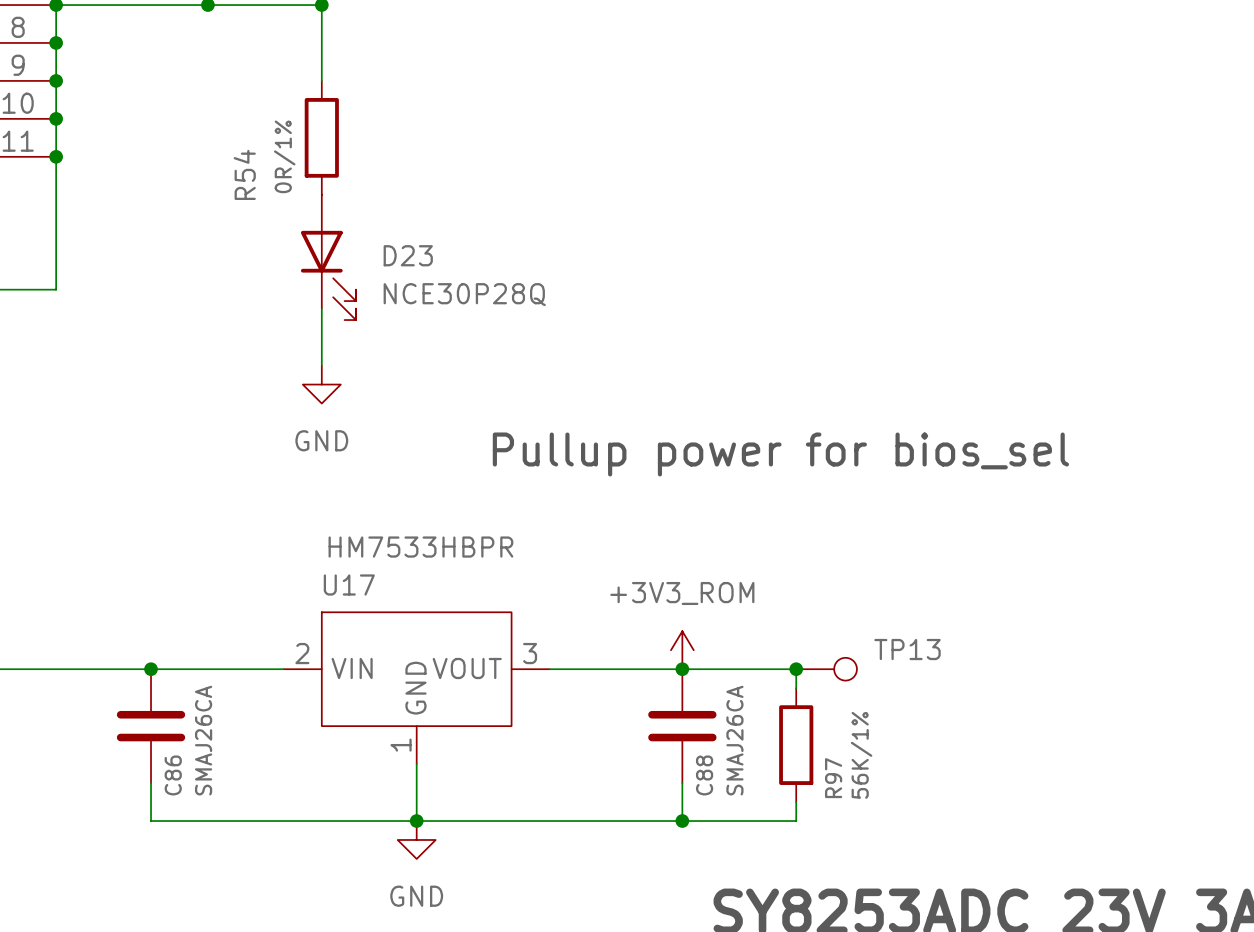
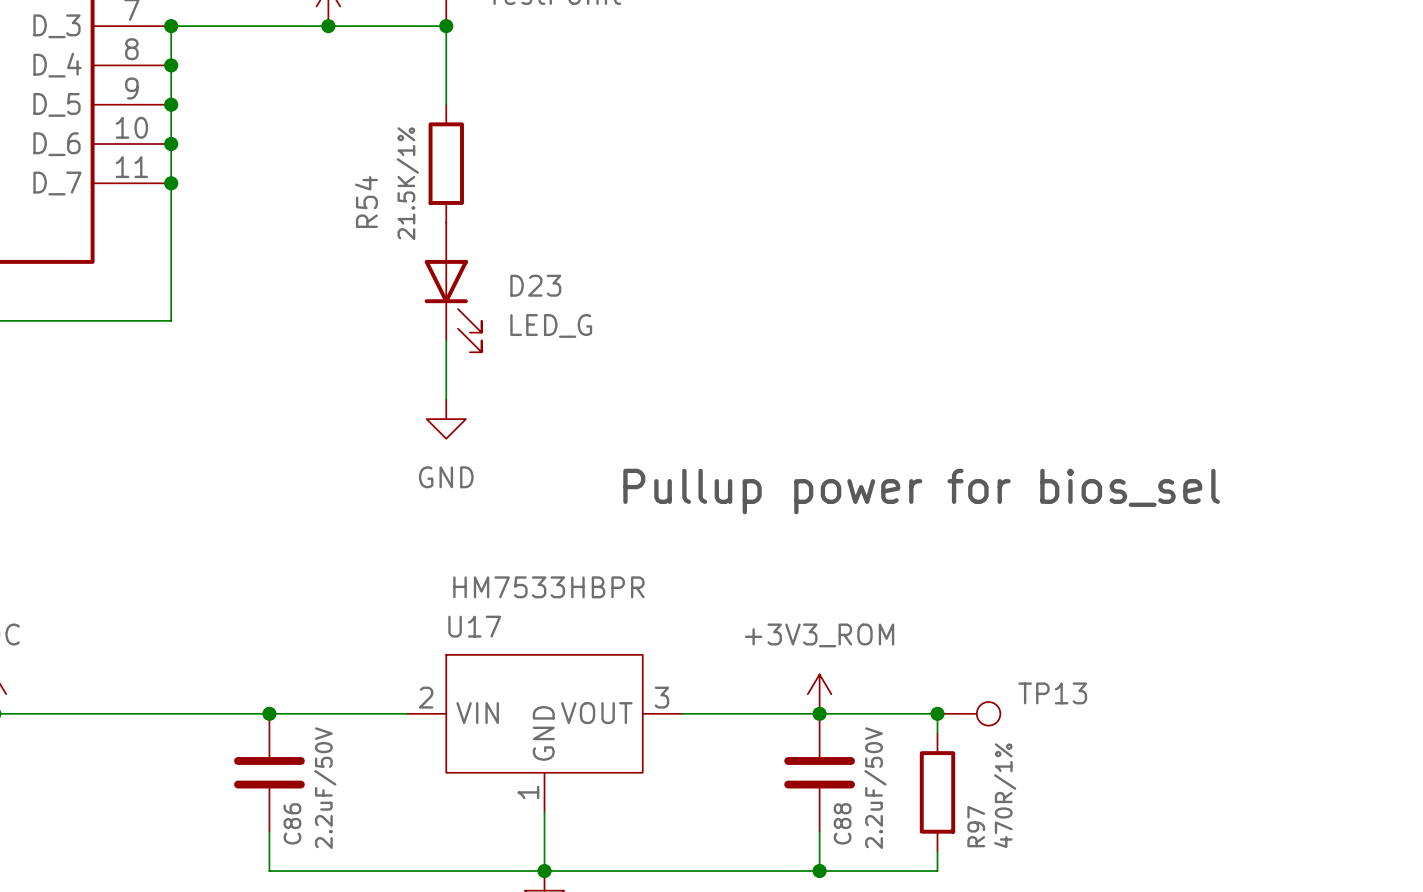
R54 value: 0R/1% (284, 156) -> 21.5K/1% (407, 183)
D23 value: NCE30P28Q (464, 294) -> LED_G (551, 325)
C86 value: SMAJ26CA (203, 740) -> 2.2uF/50V (325, 788)
C88 value: SMAJ26CA (734, 740) -> 2.2uF/50V (875, 788)
R97 value: 56K/1% (861, 755) -> 470R/1% (1005, 795)

